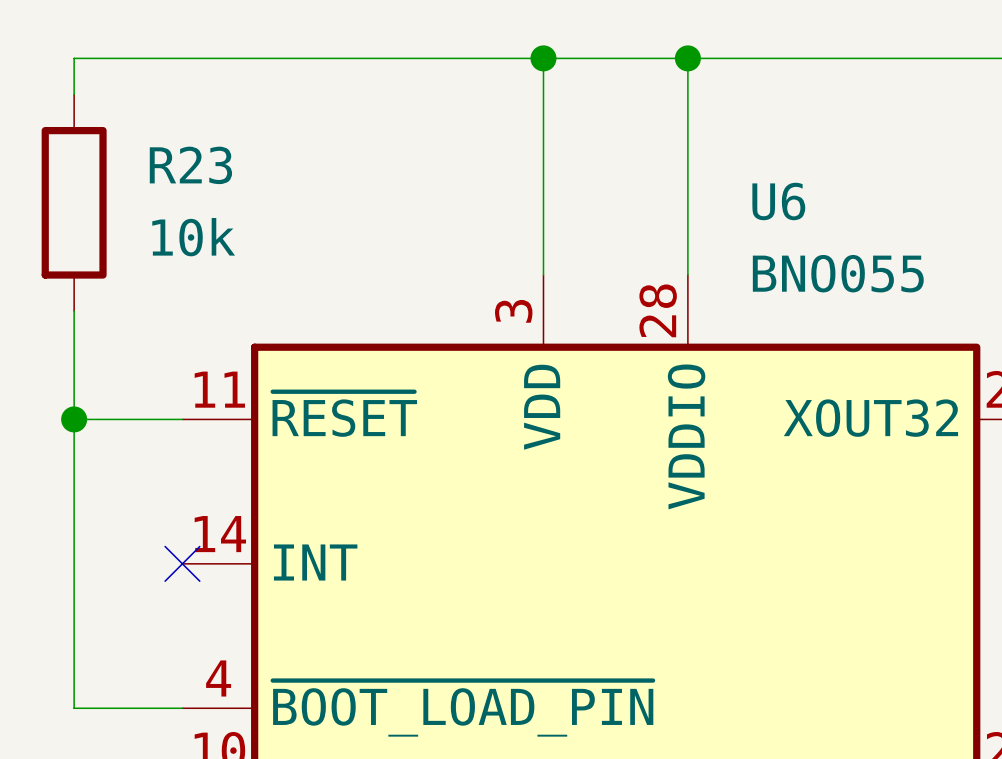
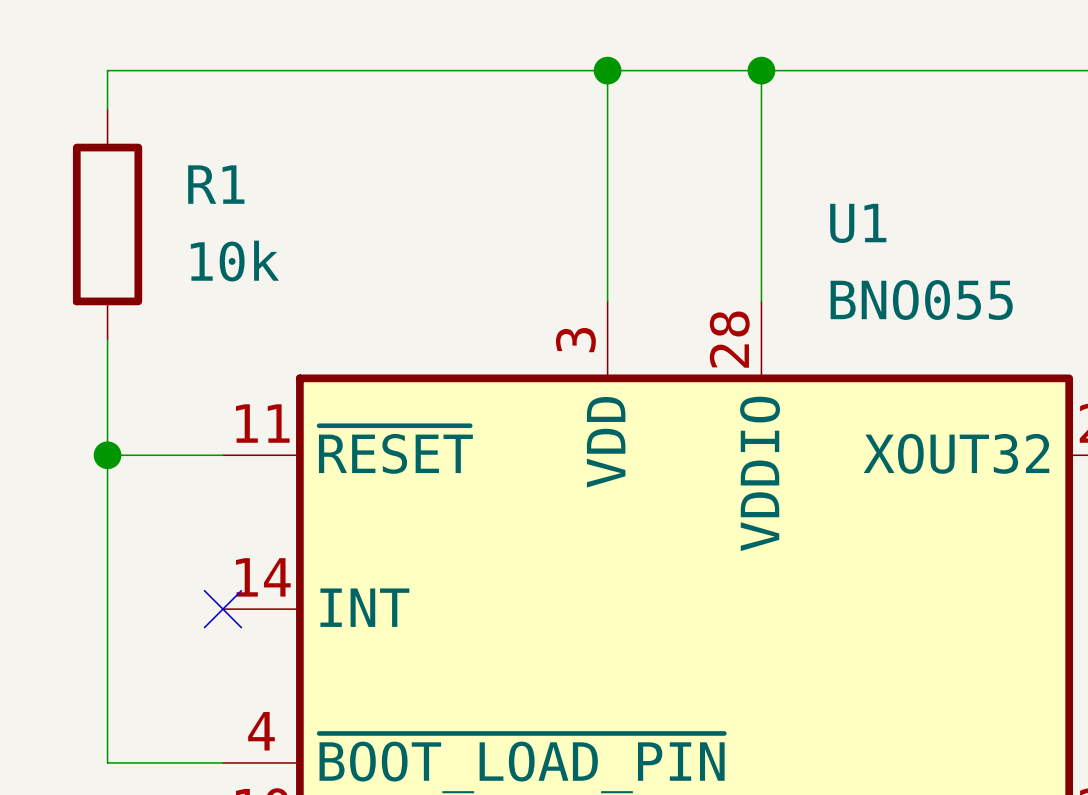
R23 name: R23 (190, 165) -> R1 (216, 184)
U6 name: U6 (778, 201) -> U1 (858, 223)

